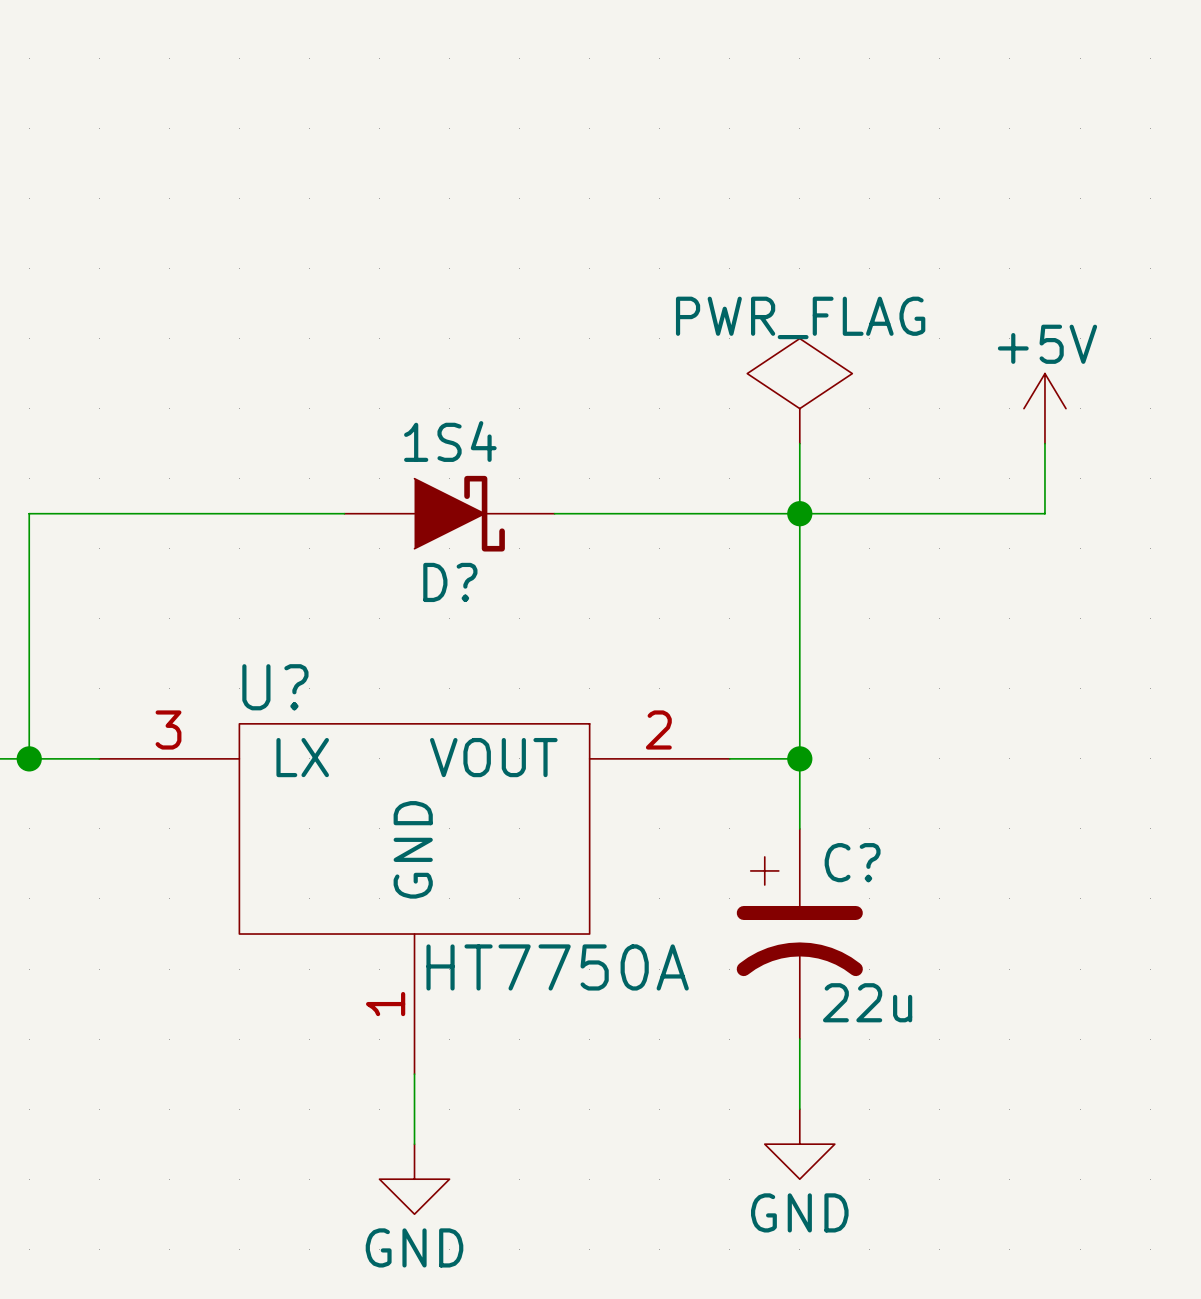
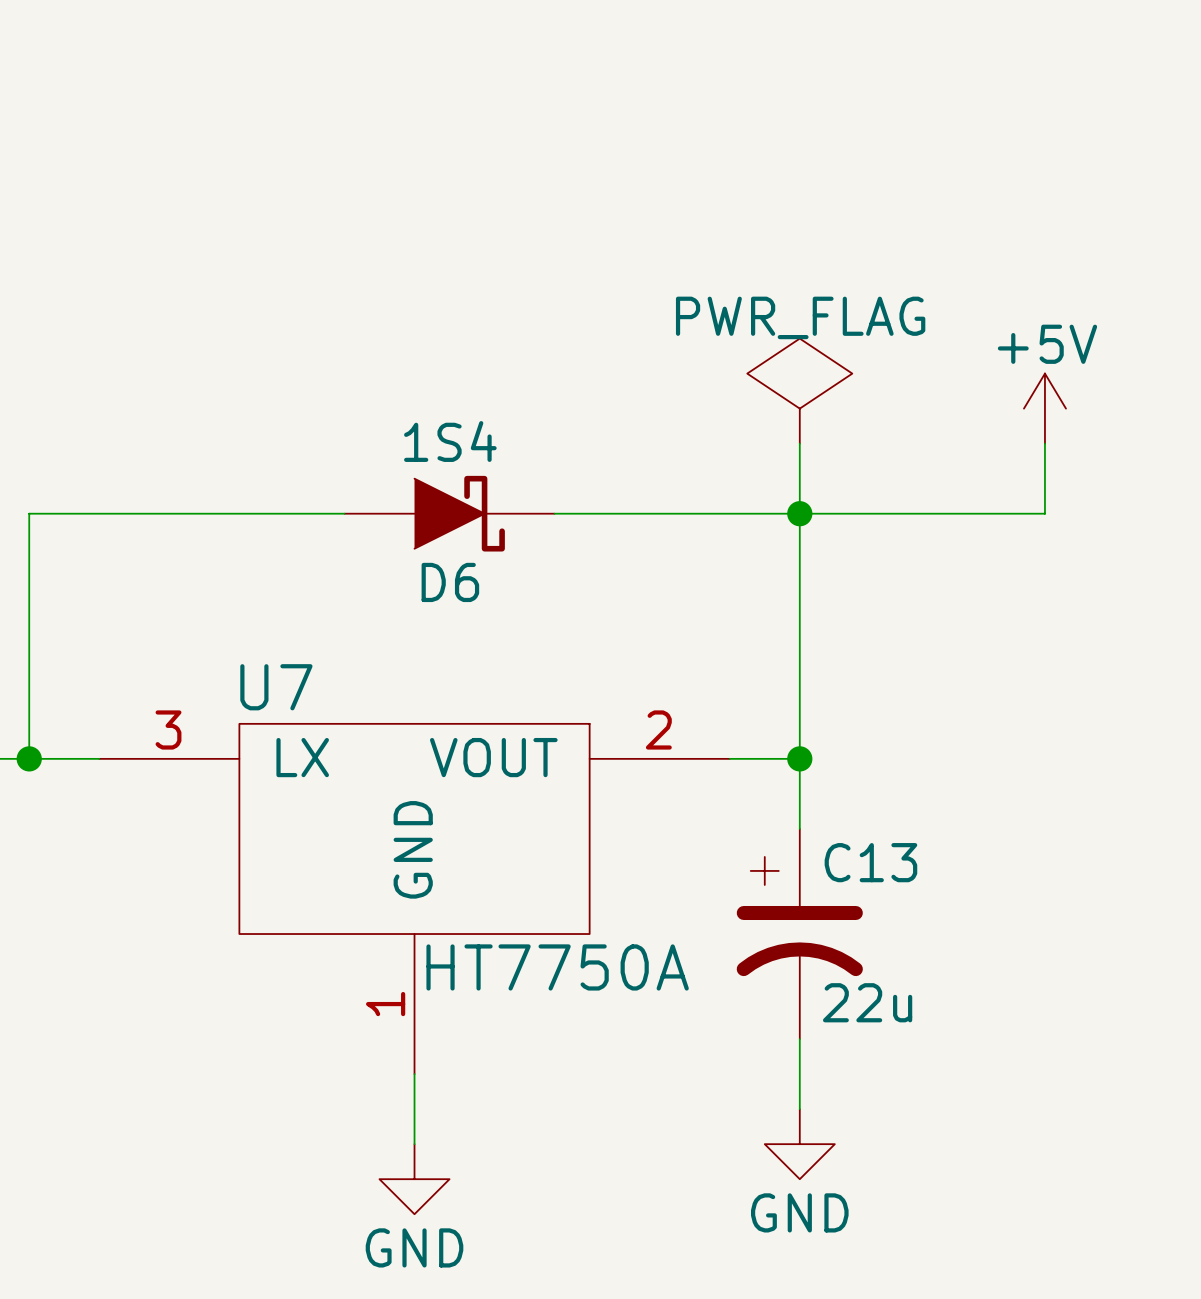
D? name: D? (450, 582) -> D6 (450, 582)
U? name: U? (275, 687) -> U7 (276, 687)
C? name: C? (852, 862) -> C13 (870, 862)

